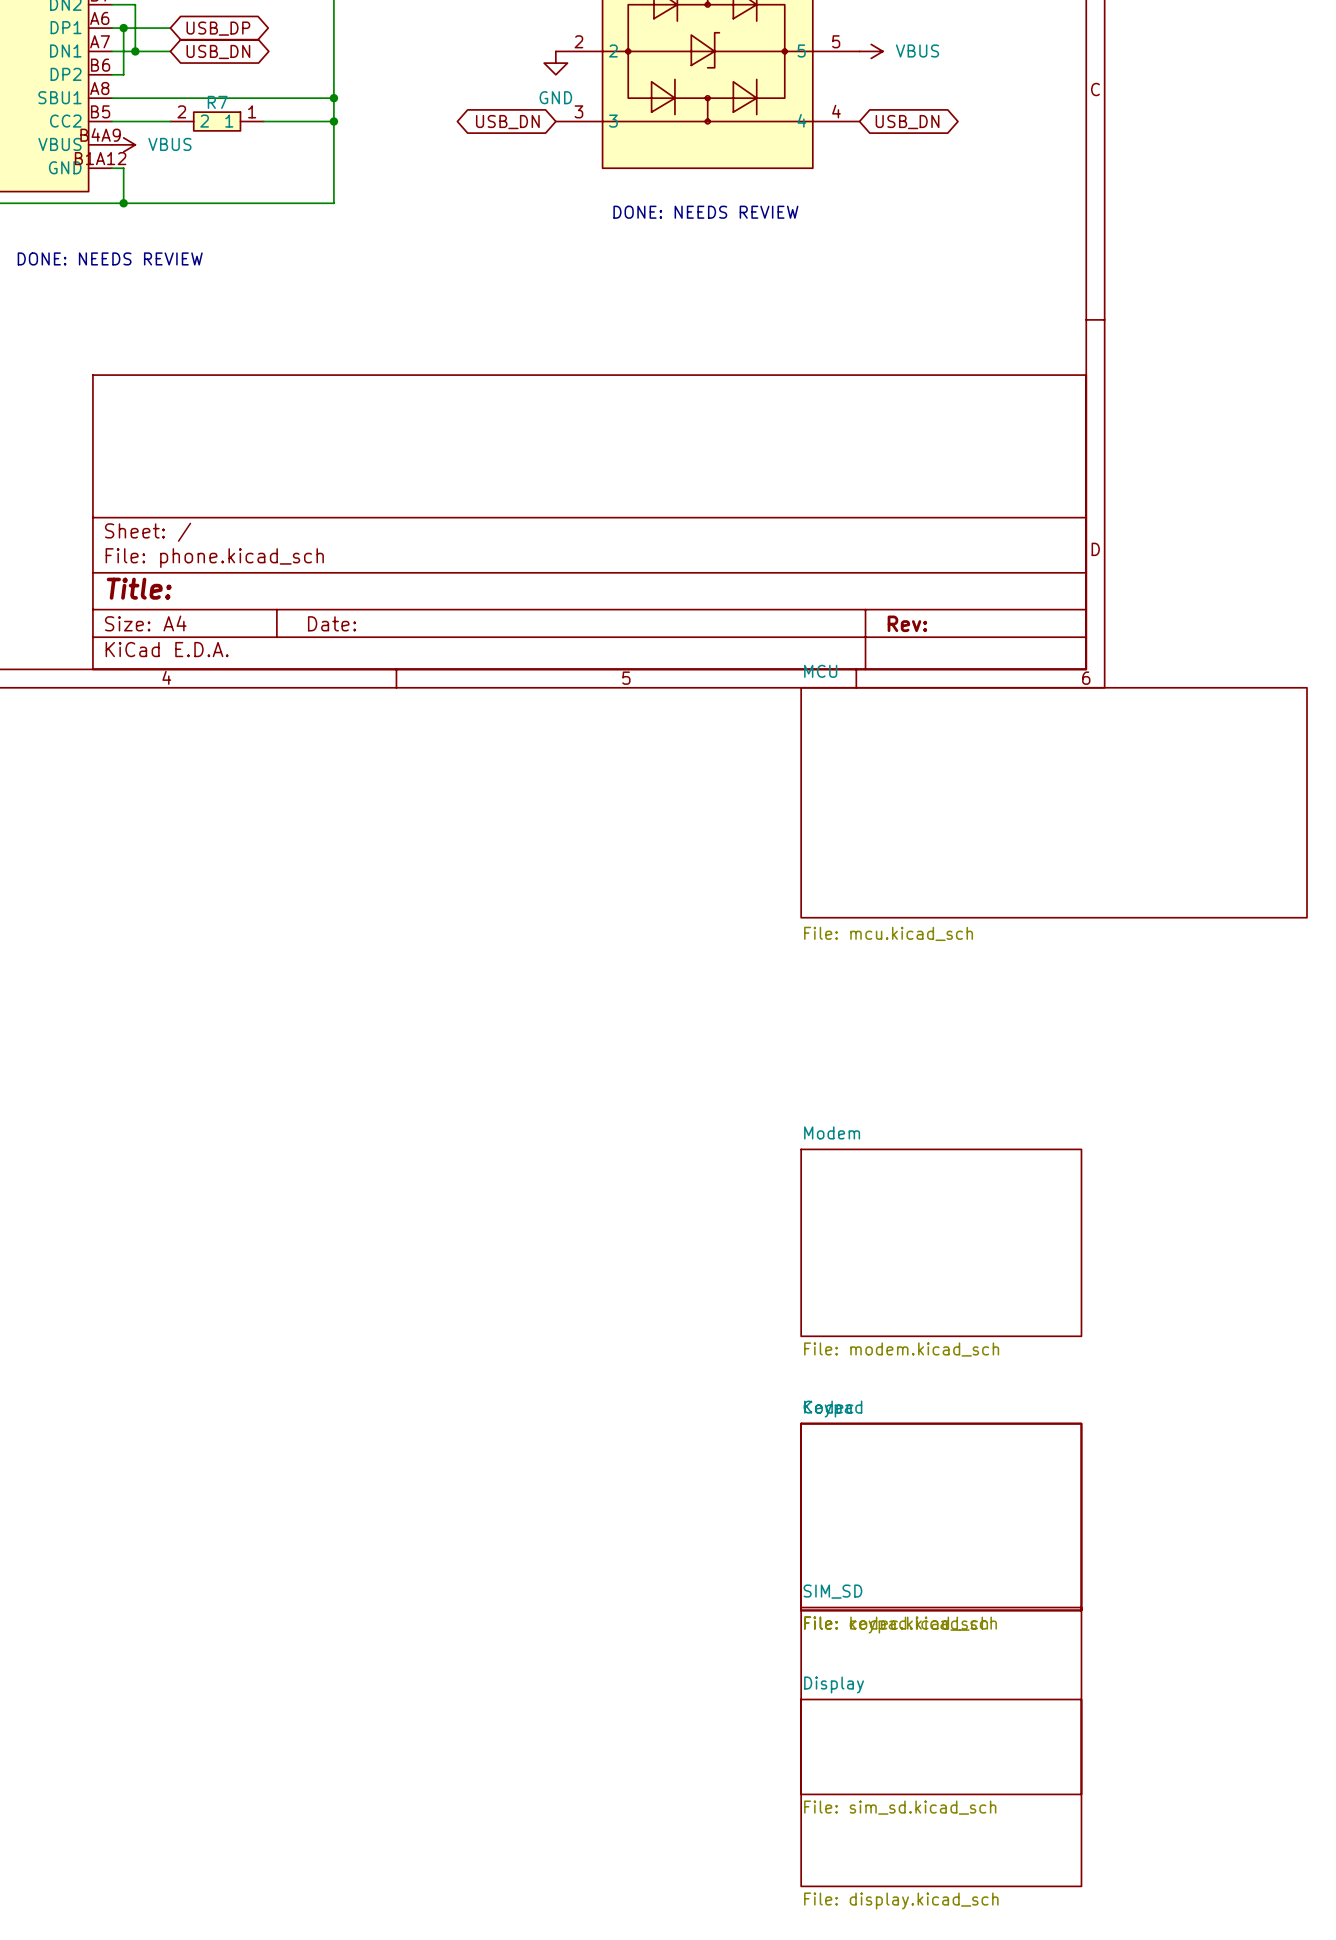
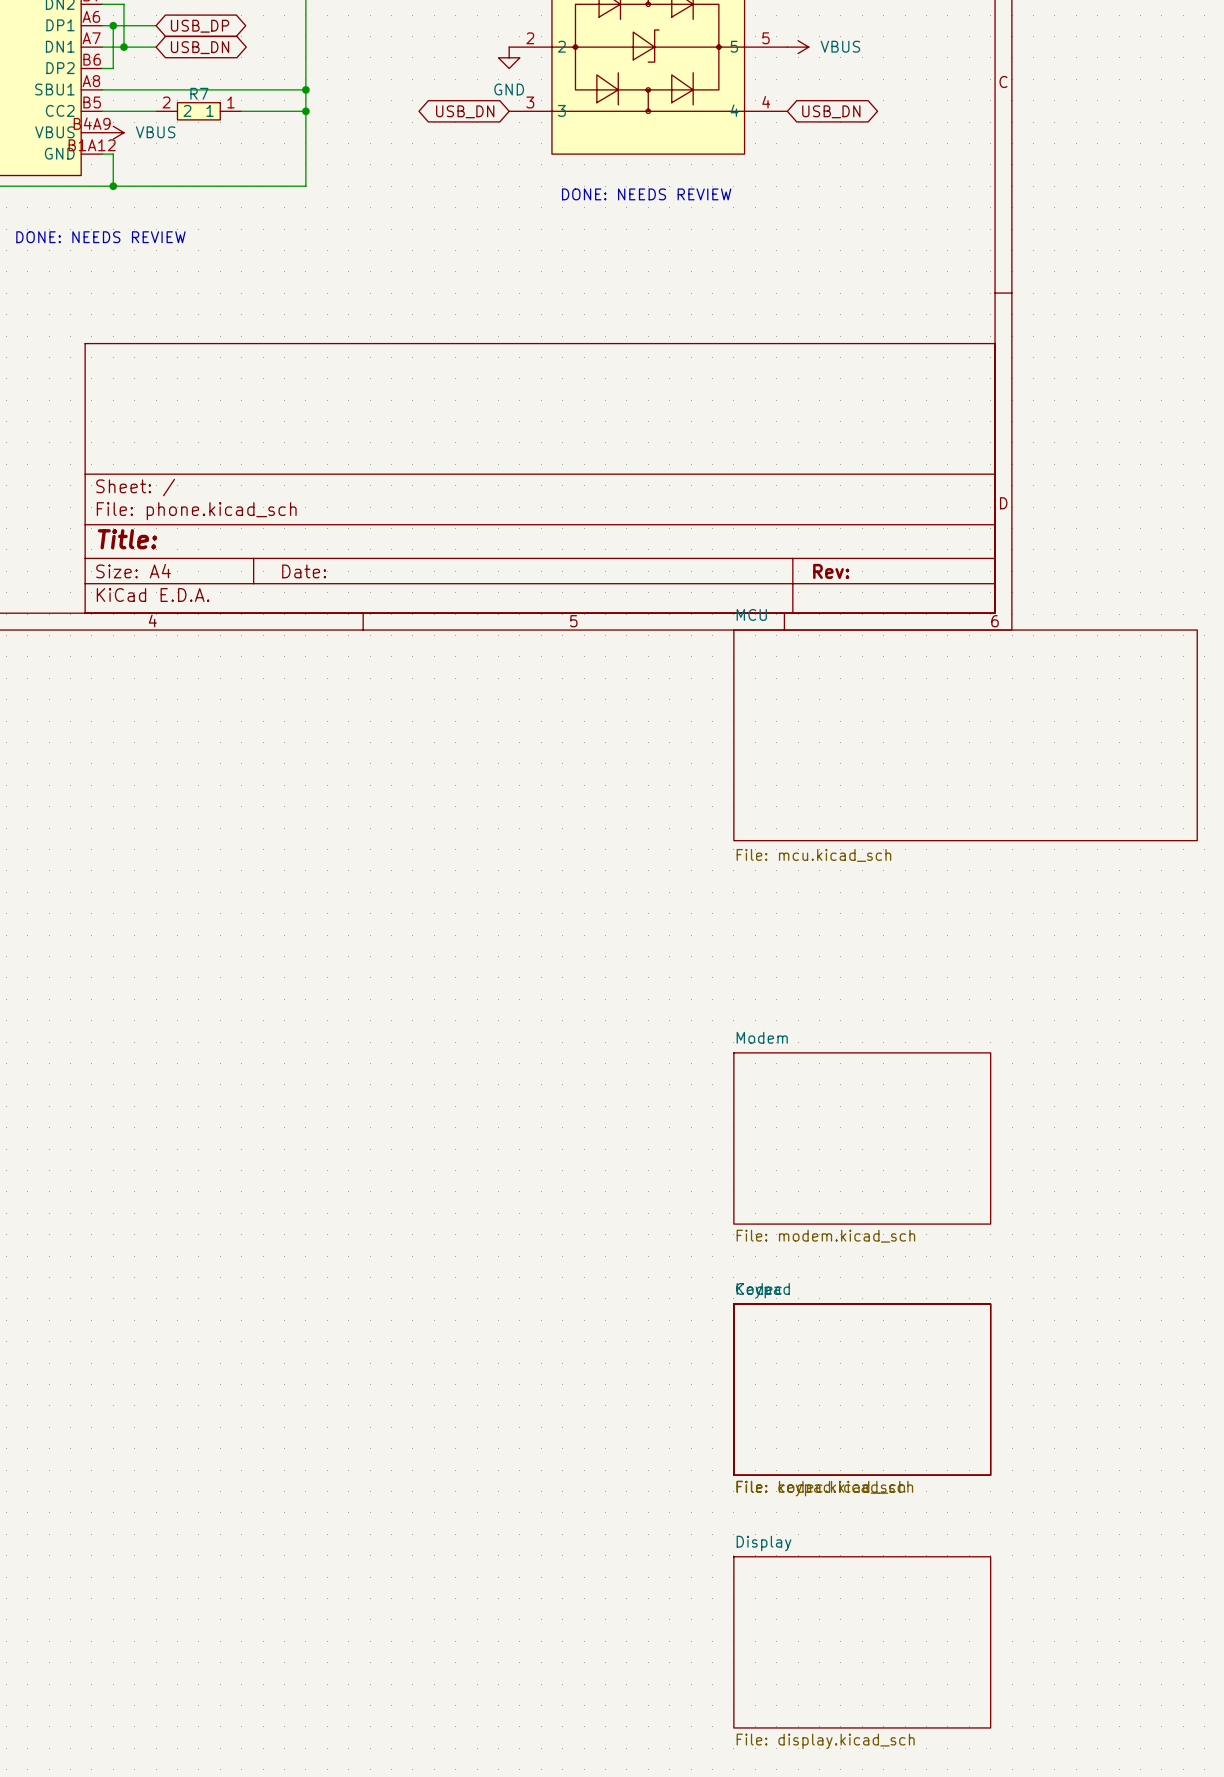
sheet SIM_SD: File: sim_sd.kicad_sch (941, 1700) -> none

